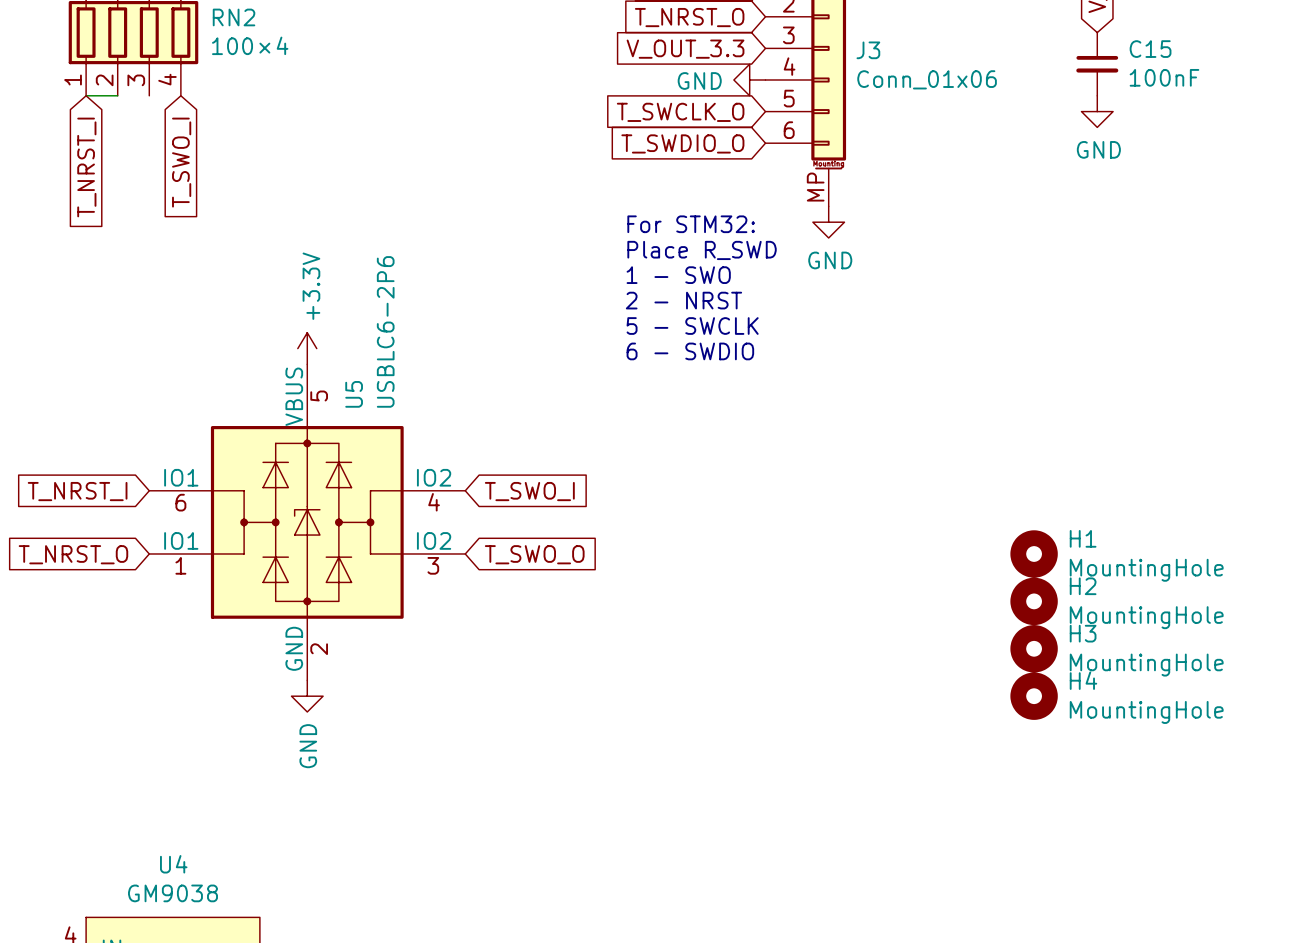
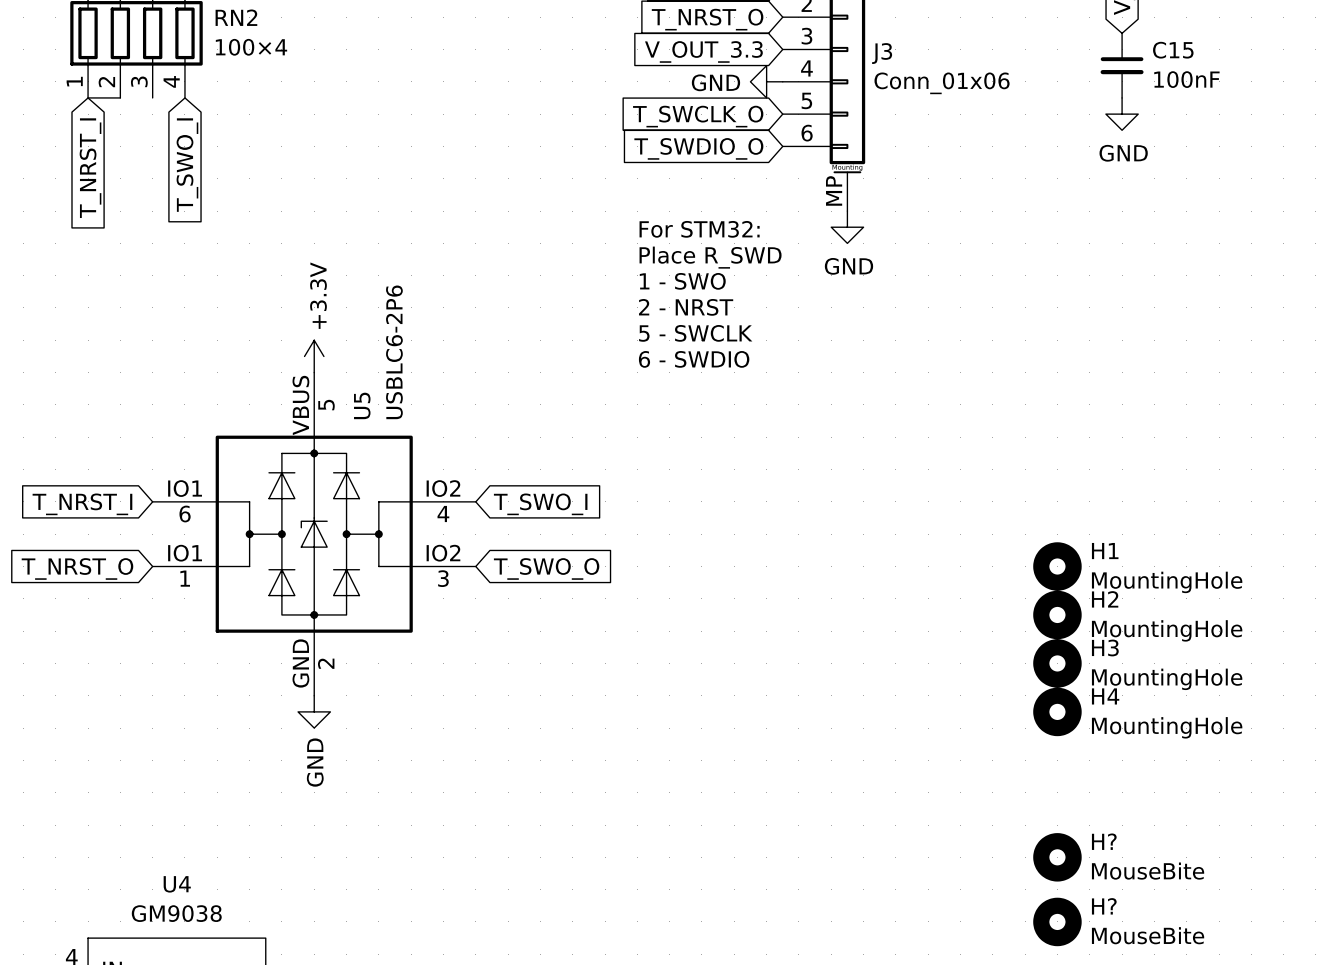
H?: none -> MouseBite (1057, 857)
H?: none -> MouseBite (1057, 921)

